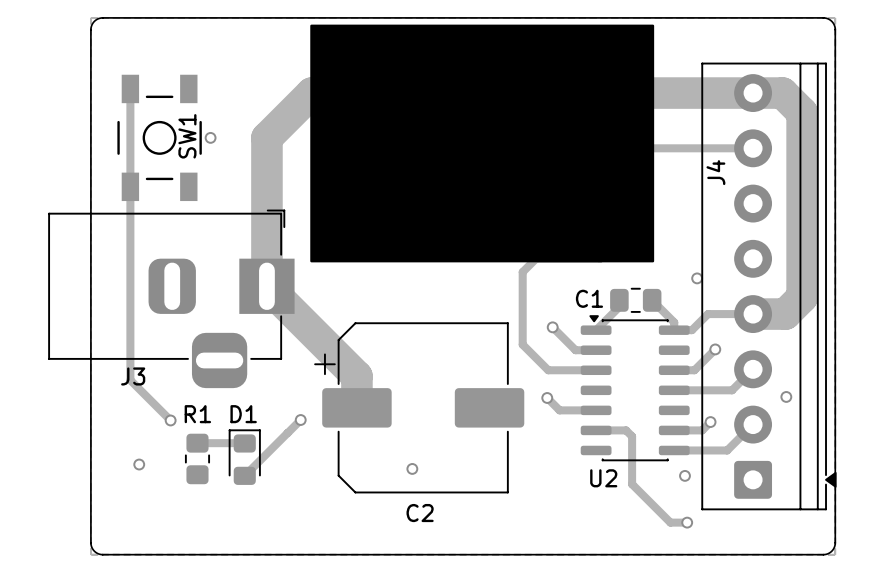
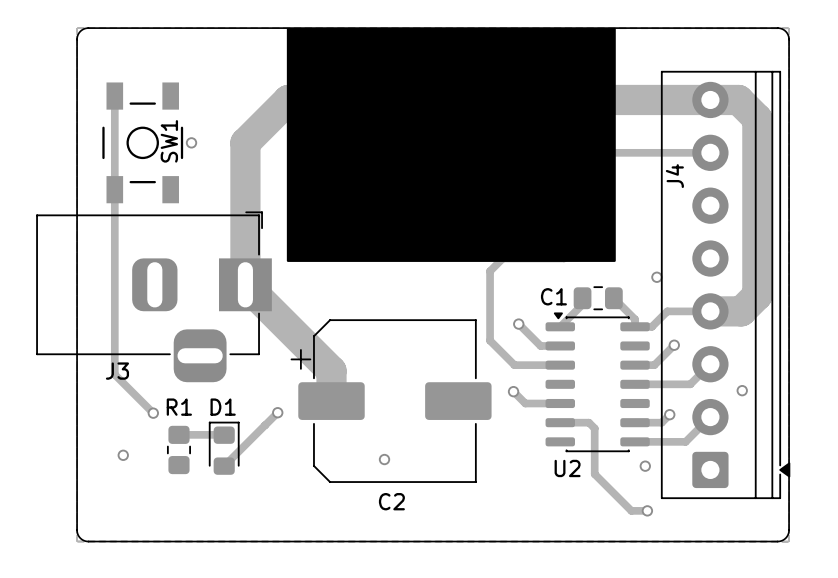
drawing shape: [310, 24, 655, 263] -> [286, 28, 616, 262]

